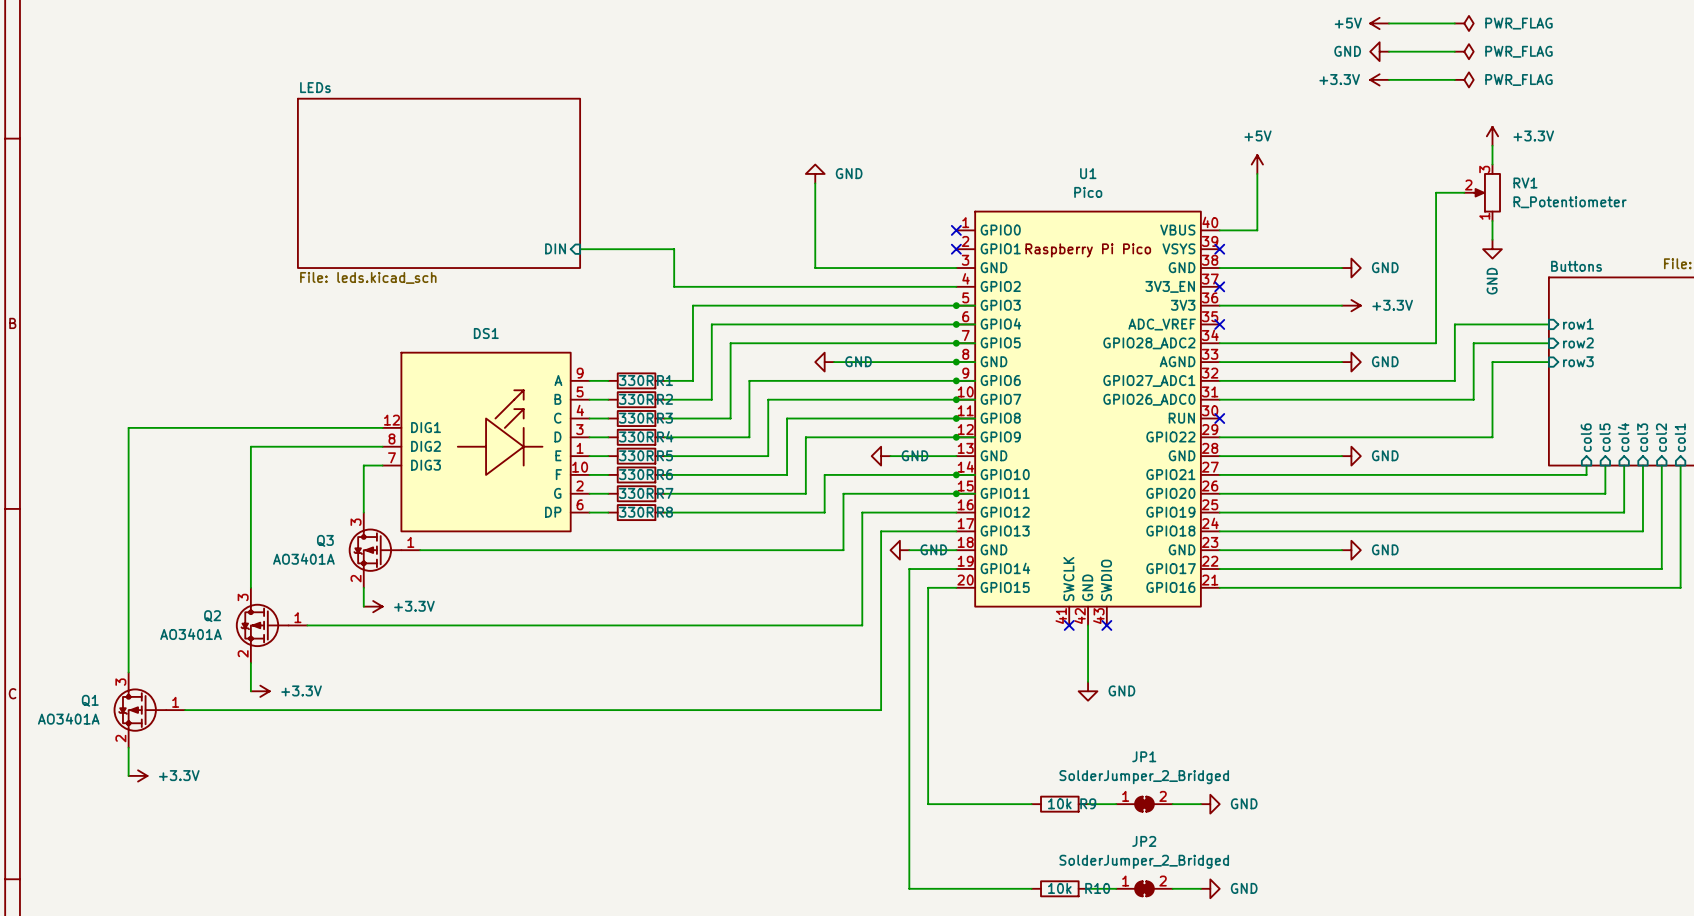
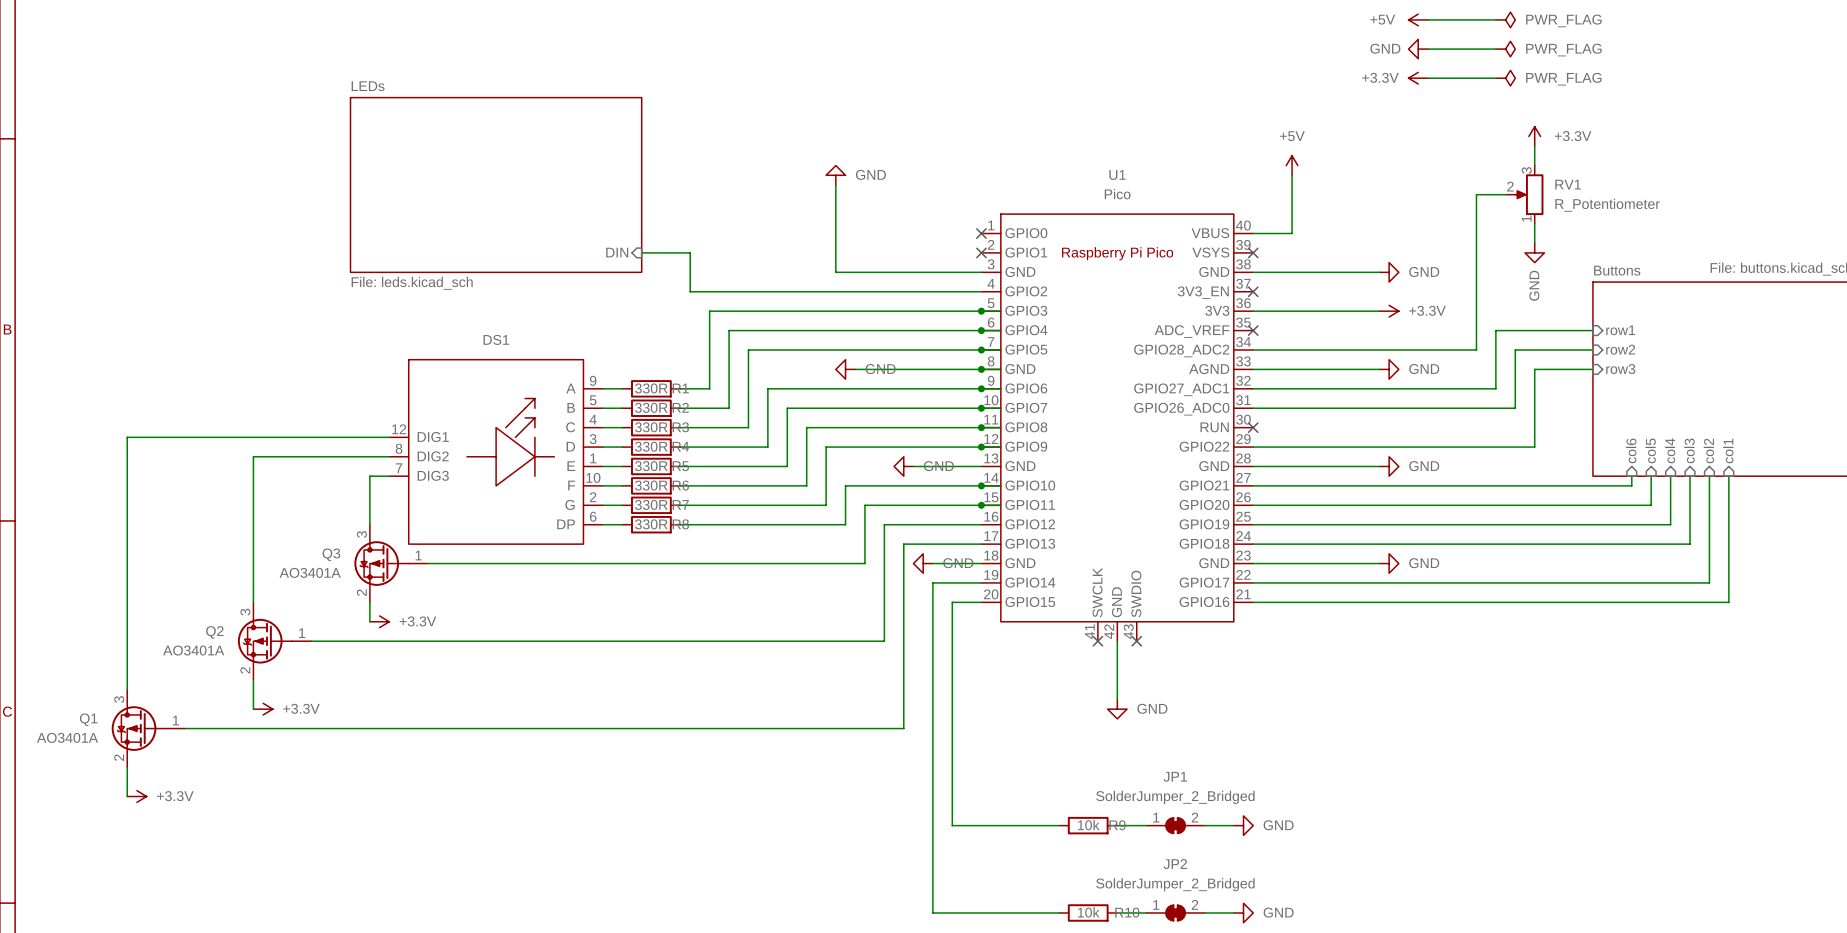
sheet LEDs position: (439, 183) -> (496, 184)
sheet pin position: DIN (555, 248) -> DIN (617, 252)
wire: (580, 249) (627, 249) -> none

